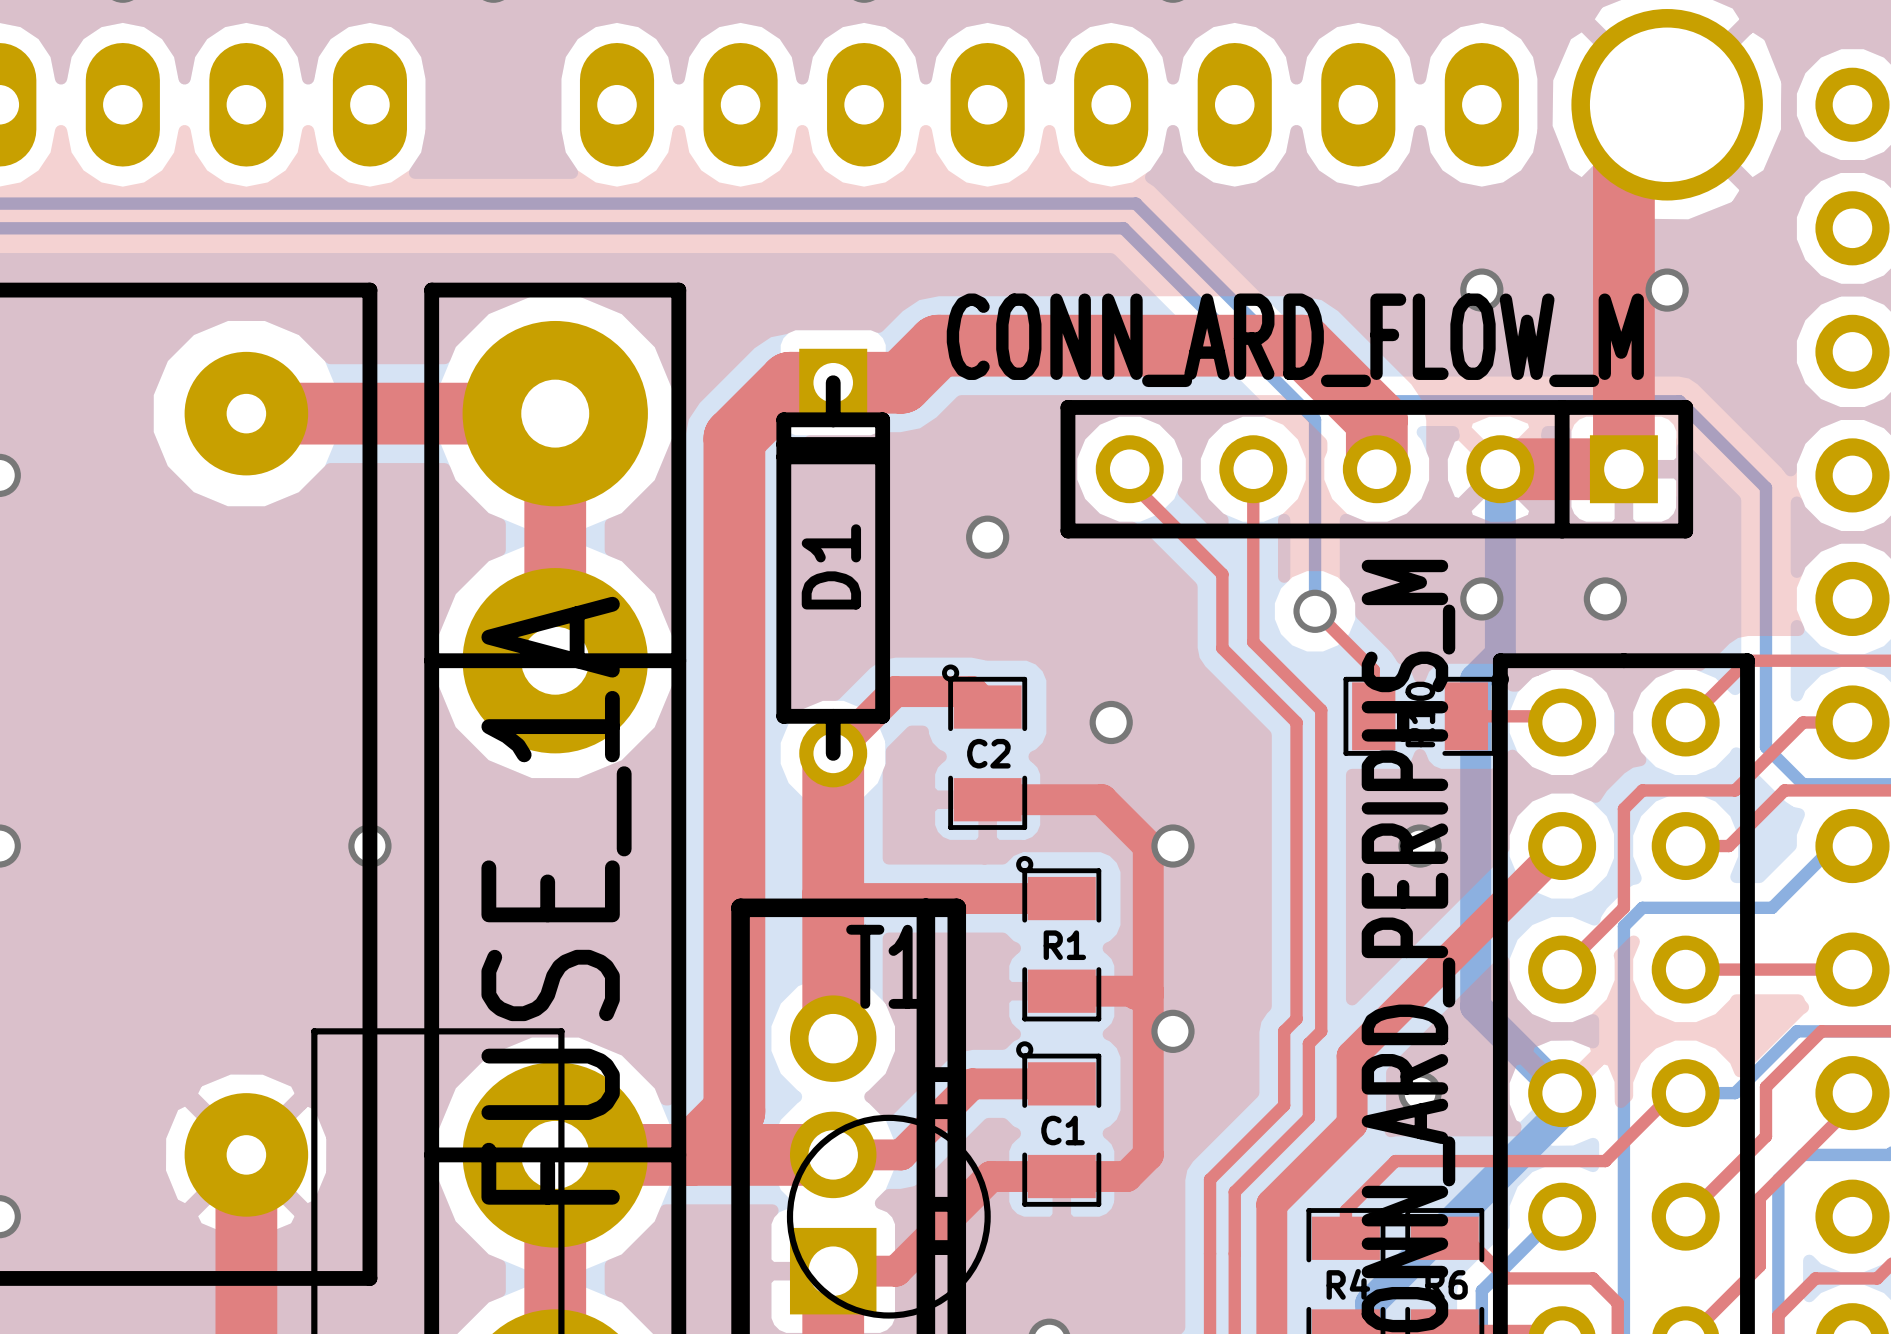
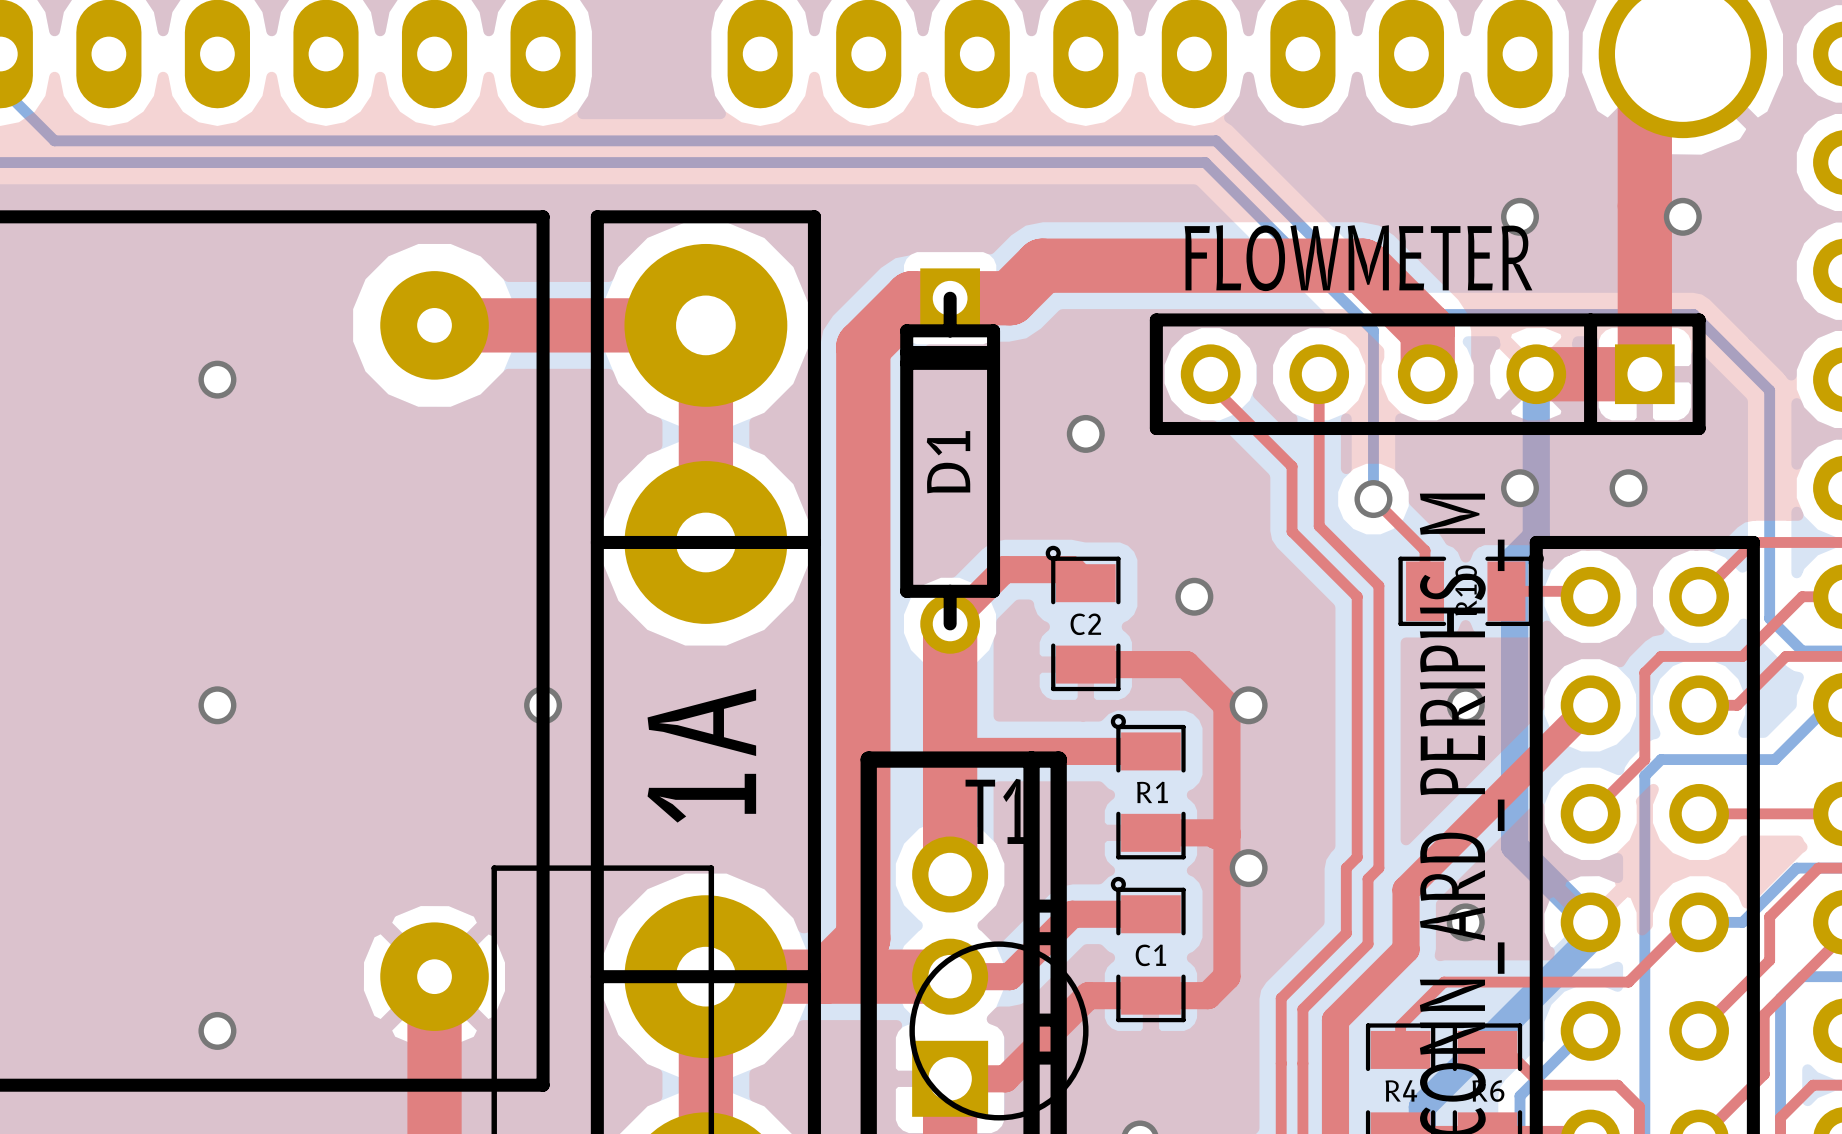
part value: CONN_ARD_FLOW_M (1295, 340) -> FLOWMETER (1358, 258)
part value: FUSE_1A (556, 900) -> 1A (701, 755)

